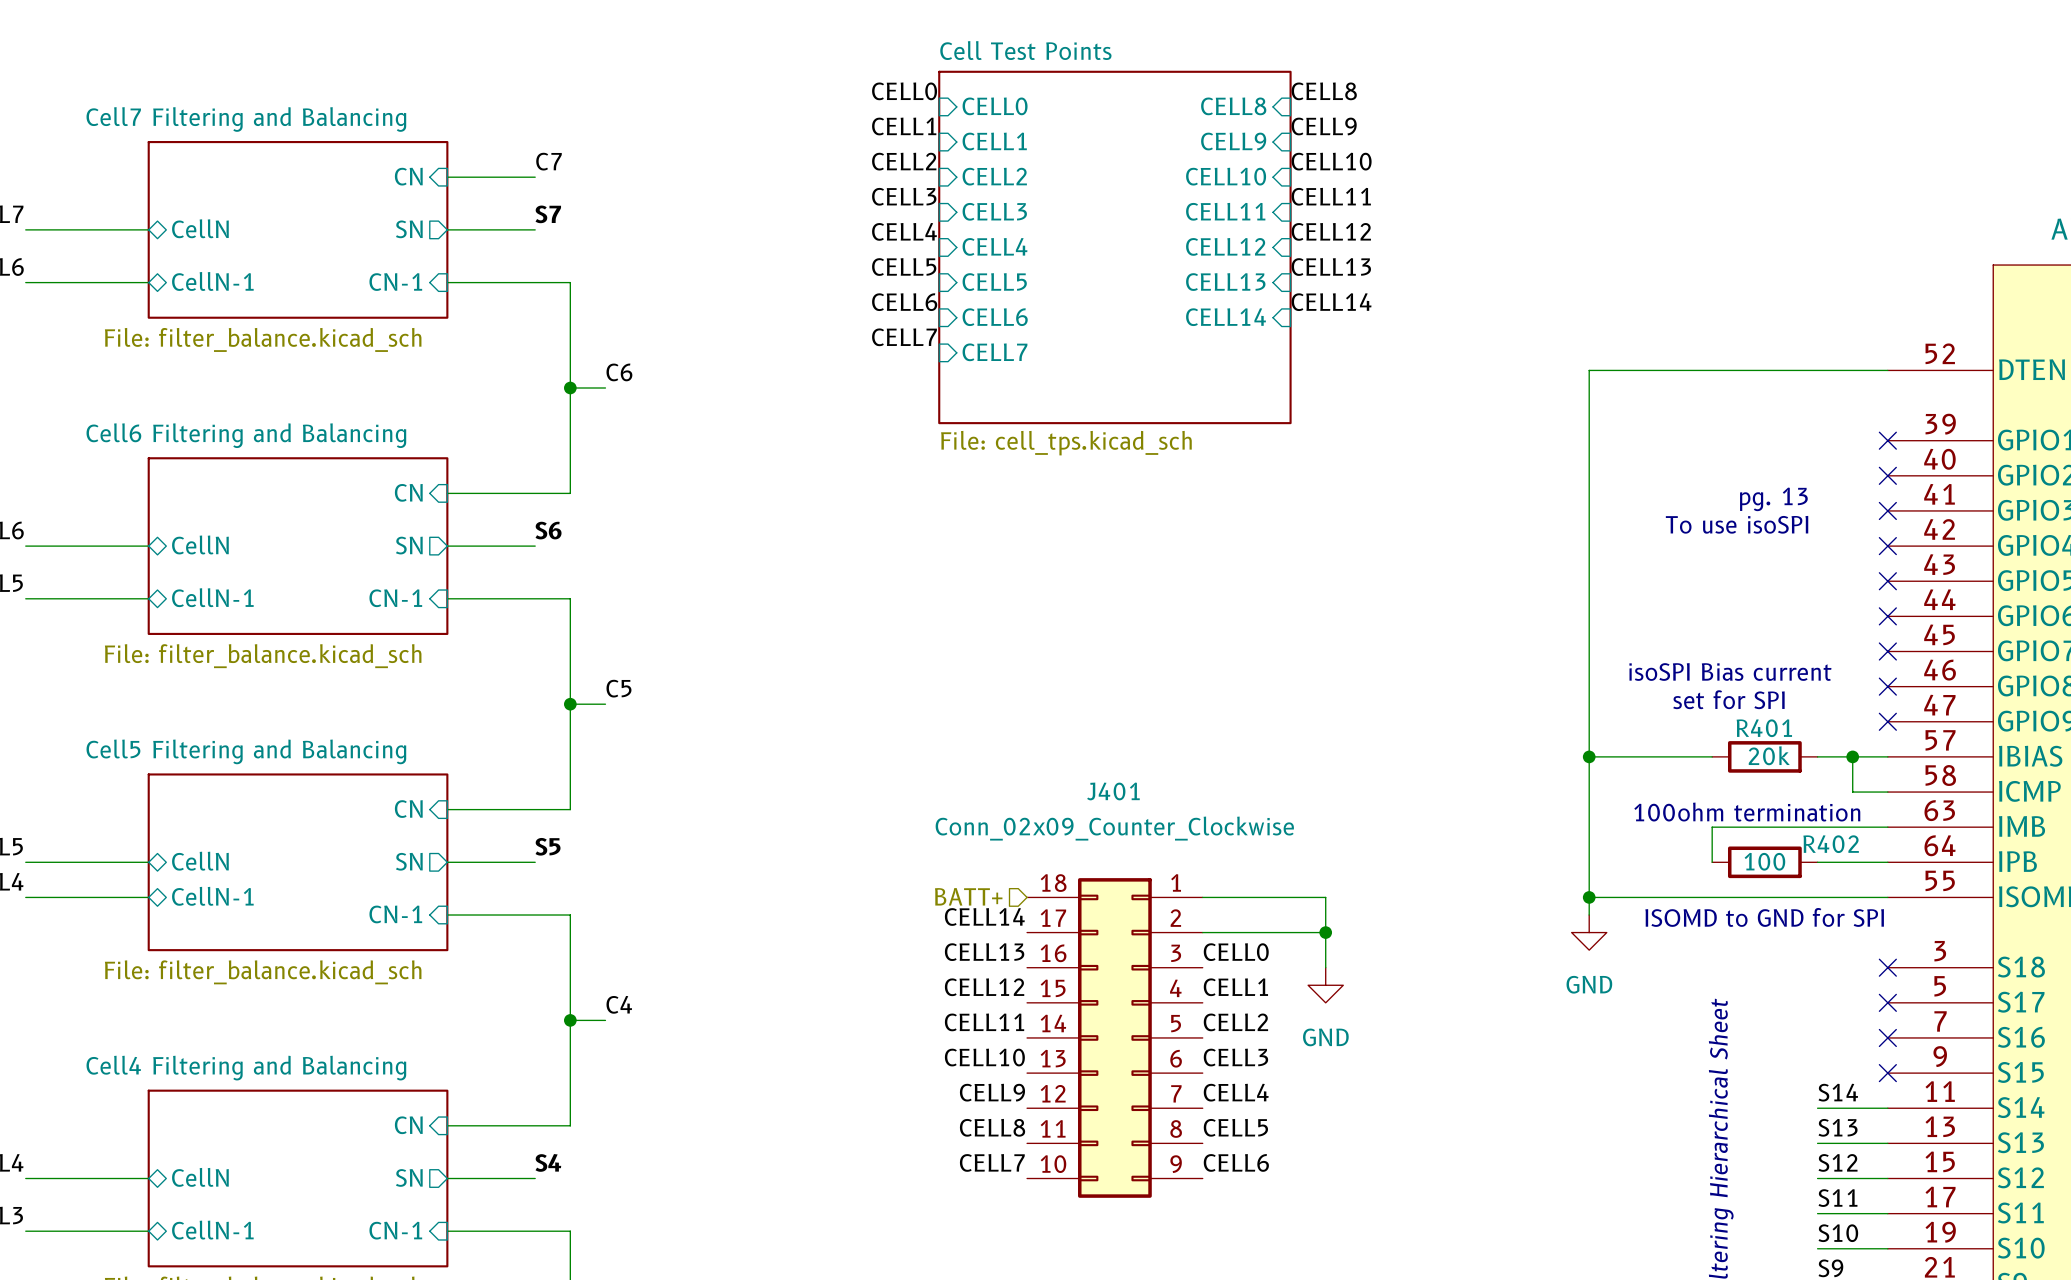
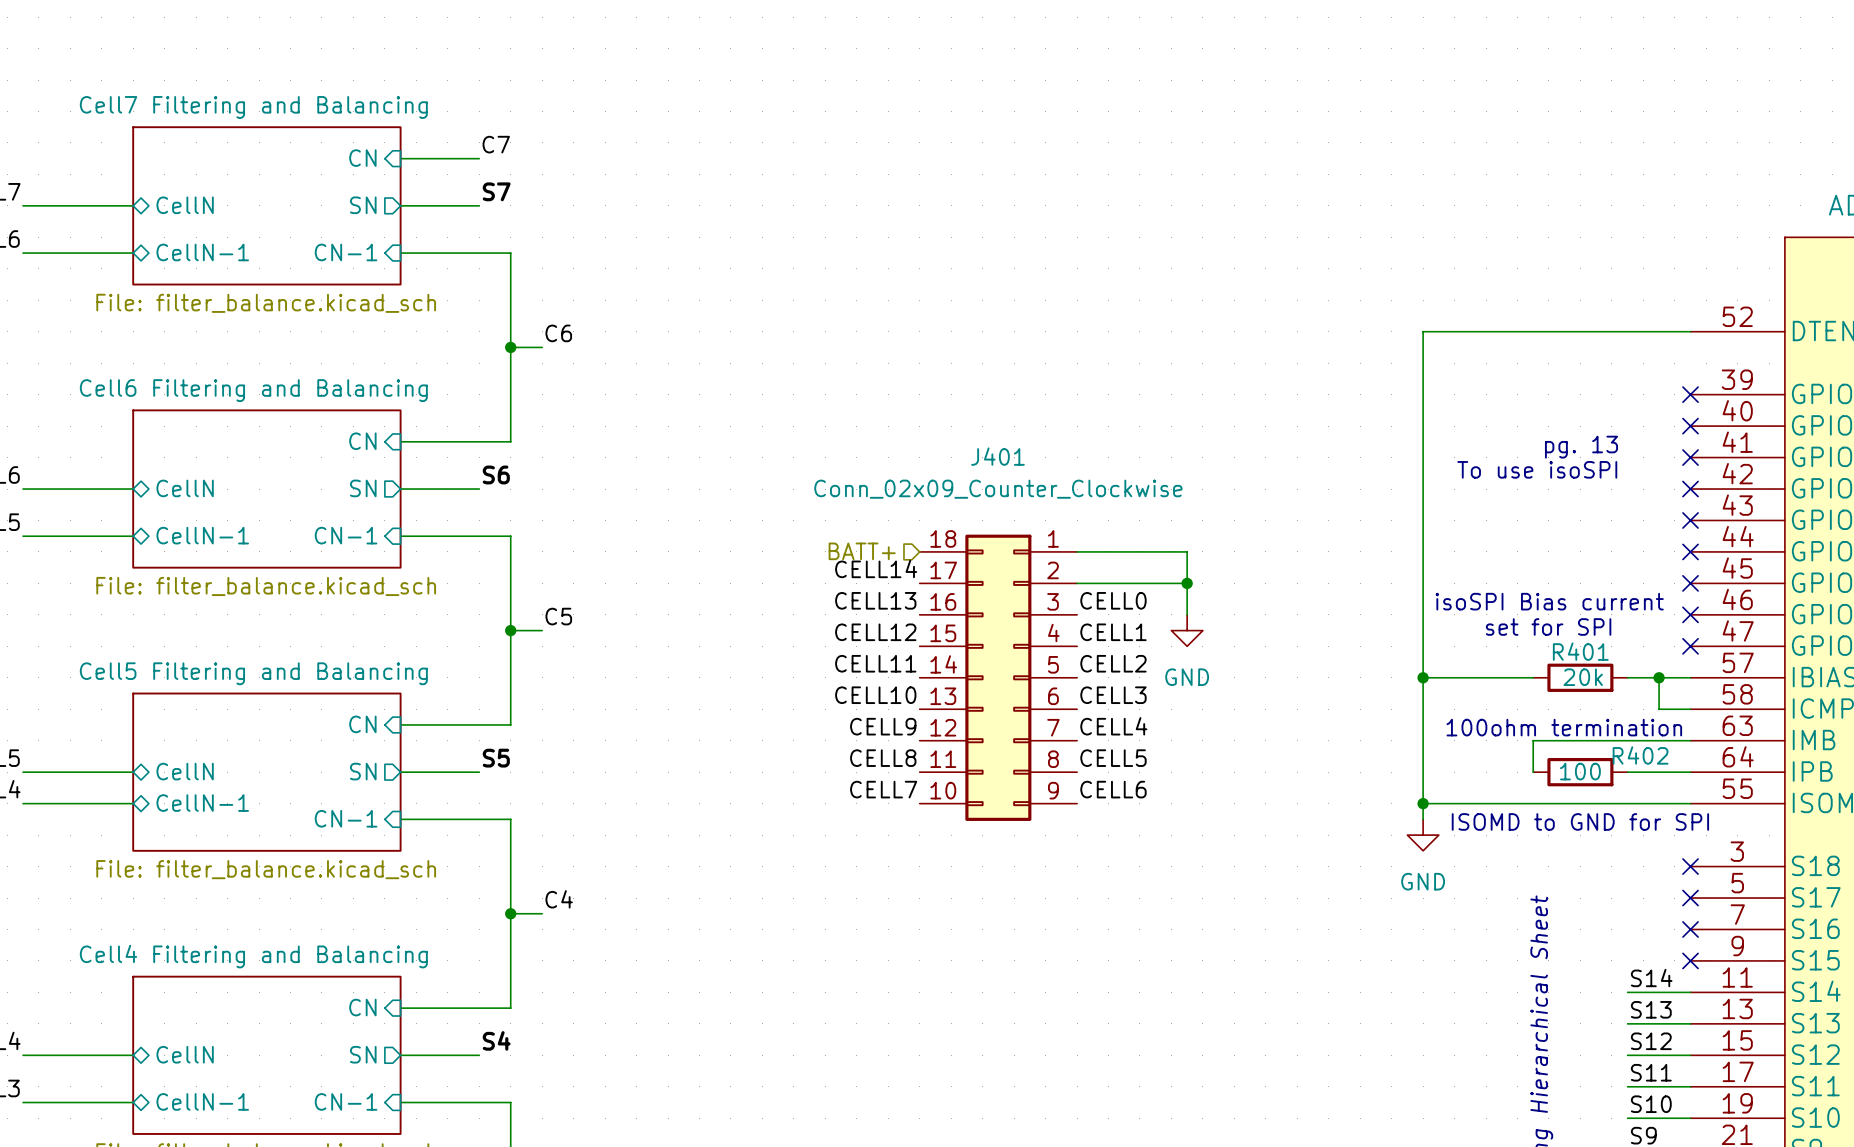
label: CELL0 (904, 91) -> none
label: CELL8 (1324, 91) -> none
sheet pin: CELL0 (995, 106) -> none
sheet pin: CELL8 (1233, 106) -> none
label: CELL1 (904, 126) -> none
label: CELL9 (1324, 126) -> none
sheet pin: CELL1 (994, 141) -> none
sheet pin: CELL9 (1233, 141) -> none
label: CELL2 (904, 161) -> none
label: CELL10 (1331, 161) -> none
sheet pin: CELL2 (994, 176) -> none
sheet pin: CELL10 (1226, 176) -> none
label: CELL3 (904, 196) -> none
label: CELL11 (1331, 196) -> none
sheet pin: CELL3 (994, 211) -> none
sheet pin: CELL11 (1225, 211) -> none
label: CELL4 (904, 231) -> none
label: CELL12 (1331, 231) -> none
sheet pin: CELL4 (994, 246) -> none
sheet pin: CELL12 (1225, 246) -> none
sheet Cell Test Points: File: cell_tps.kicad_sch (1114, 247) -> none
label: CELL5 (904, 267) -> none
label: CELL13 (1331, 267) -> none
sheet pin: CELL5 (994, 282) -> none
sheet pin: CELL13 (1225, 282) -> none
label: CELL6 (904, 302) -> none
label: CELL14 (1331, 302) -> none
sheet pin: CELL6 (995, 317) -> none
sheet pin: CELL14 (1226, 317) -> none
label: CELL7 (904, 337) -> none
sheet pin: CELL7 (994, 352) -> none
label: none -> CELL14 (876, 568)
junction: none -> (1187, 583)
label: none -> CELL13 (875, 600)
label: none -> CELL12 (875, 632)
hierarchical label position: BATT+ (968, 896) -> BATT+ (862, 551)
wire: (1202, 897) (1325, 897) (1325, 967) -> (1077, 551) (1187, 551) (1187, 614)
label: CELL14 (984, 916) -> CELL7 (883, 789)
wire: (1202, 932) (1325, 932) -> (1077, 583) (1187, 583)
junction: (1325, 932) -> none
label: CELL13 (984, 952) -> none
label position: CELL0 (1236, 952) -> CELL0 (1113, 600)
power symbol position: GND (1325, 985) -> GND (1187, 630)
label: CELL12 (984, 987) -> none
label position: CELL1 (1235, 987) -> CELL1 (1113, 632)
label position: CELL11 (984, 1022) -> CELL11 (875, 663)
label position: CELL2 (1235, 1022) -> CELL2 (1113, 663)
J401 position: (1114, 1037) -> (998, 677)
label position: CELL10 (984, 1057) -> CELL10 (875, 695)
label position: CELL3 (1235, 1057) -> CELL3 (1113, 695)
label position: CELL9 (992, 1092) -> CELL9 (883, 726)
label position: CELL4 (1236, 1092) -> CELL4 (1113, 726)
label position: CELL8 (992, 1127) -> CELL8 (883, 758)
label position: CELL5 (1235, 1127) -> CELL5 (1113, 758)
label: CELL7 (992, 1162) -> none
label position: CELL6 (1236, 1162) -> CELL6 (1113, 789)

